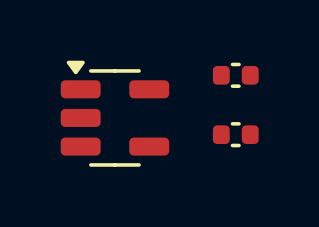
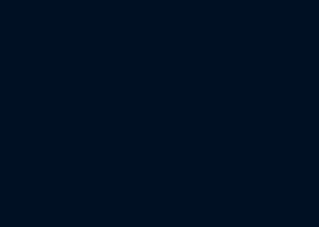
part: (235, 75) -> none
part: (114, 113) -> none
part: (235, 134) -> none

